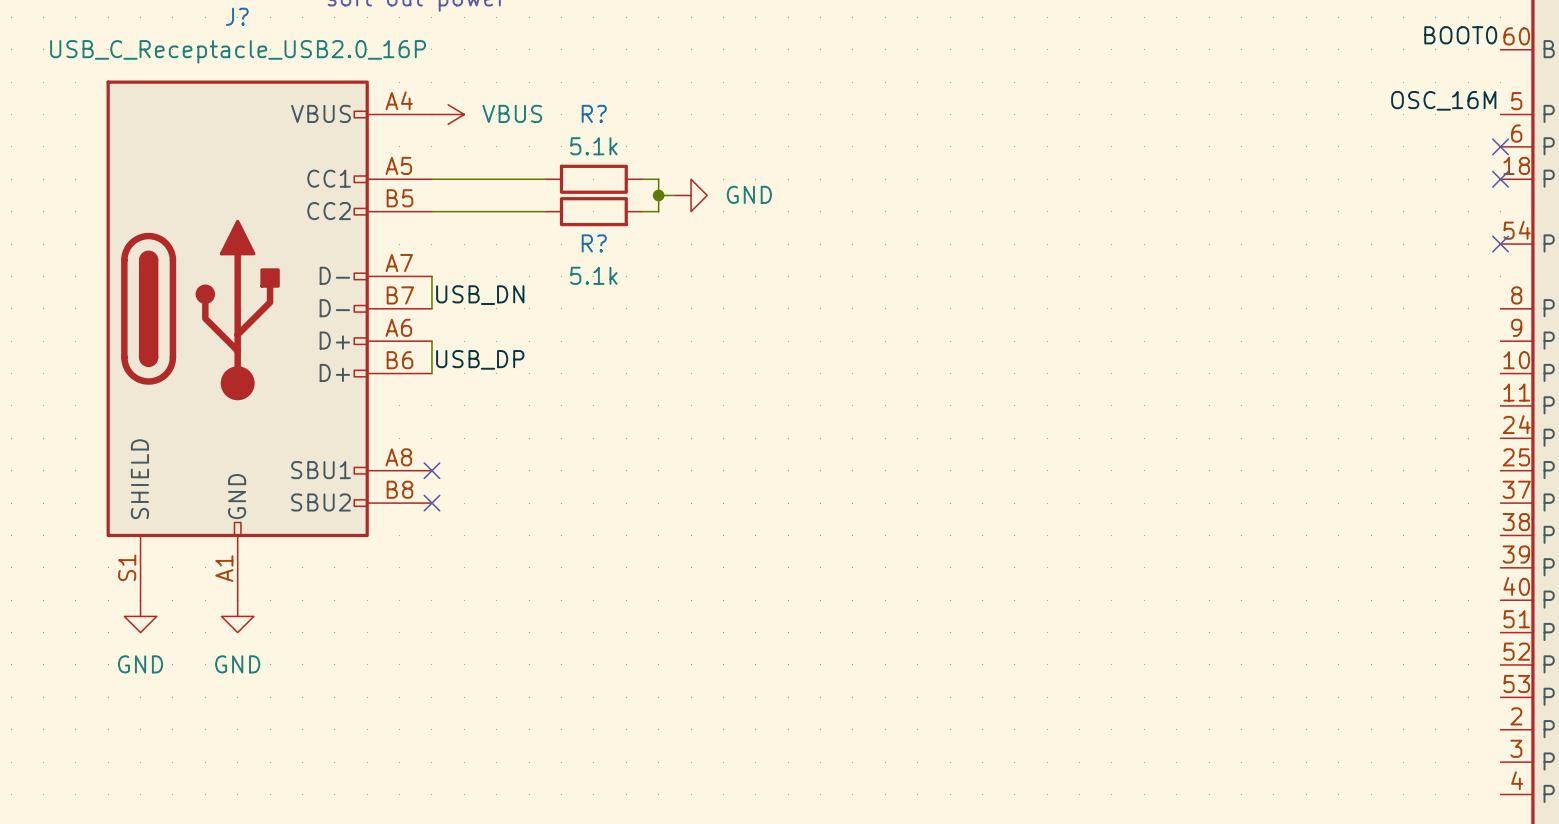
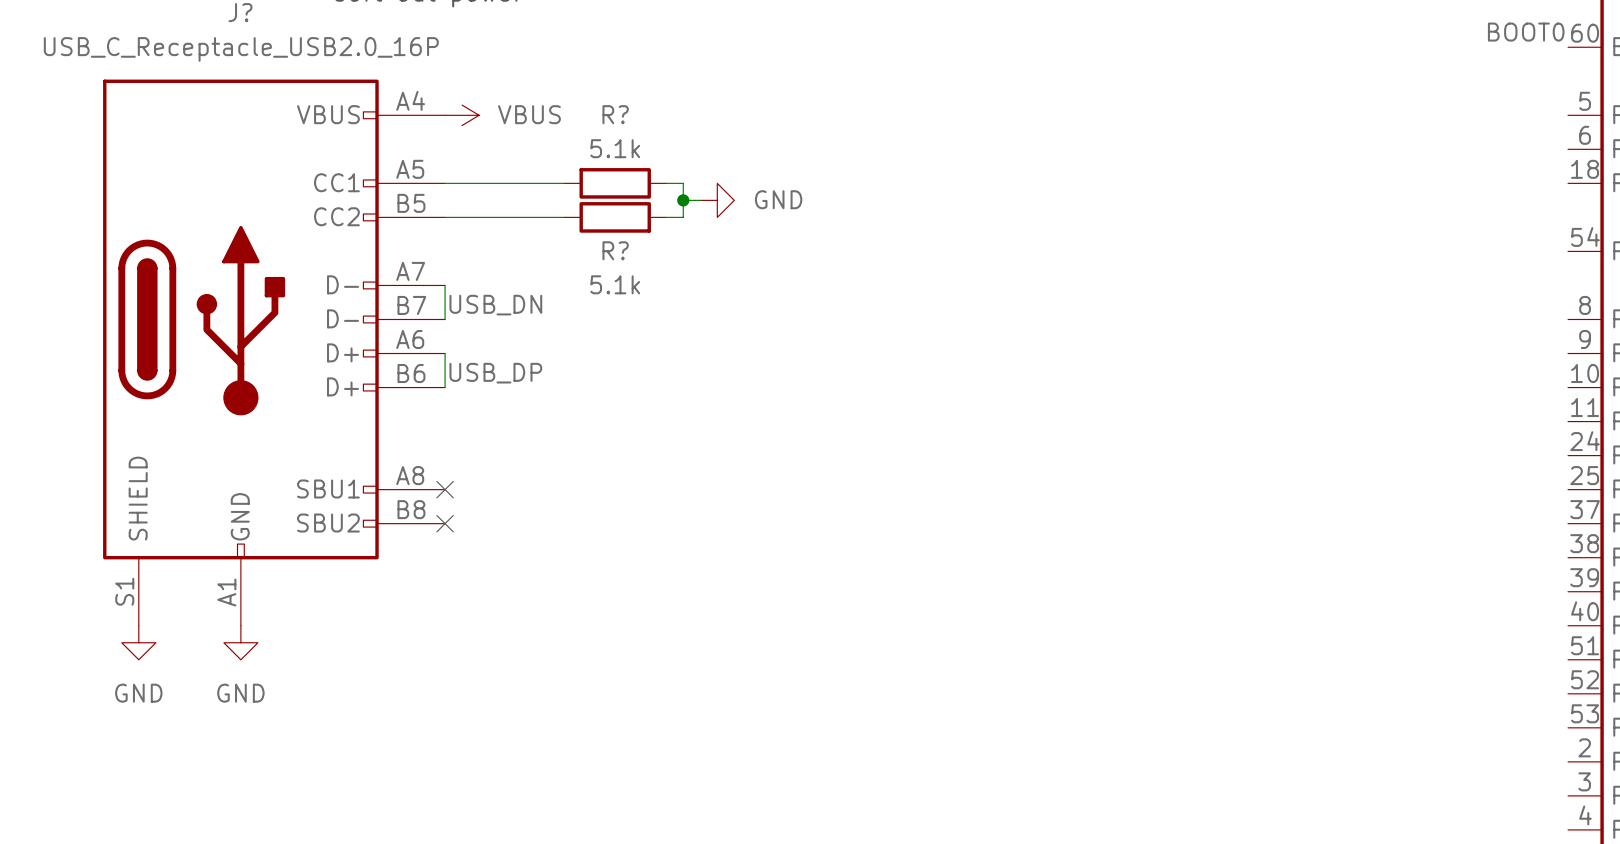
label: OSC_16M (1443, 100) -> none
no-connect mark: (1500, 146) -> none
no-connect mark: (1500, 179) -> none
no-connect mark: (1500, 244) -> none

